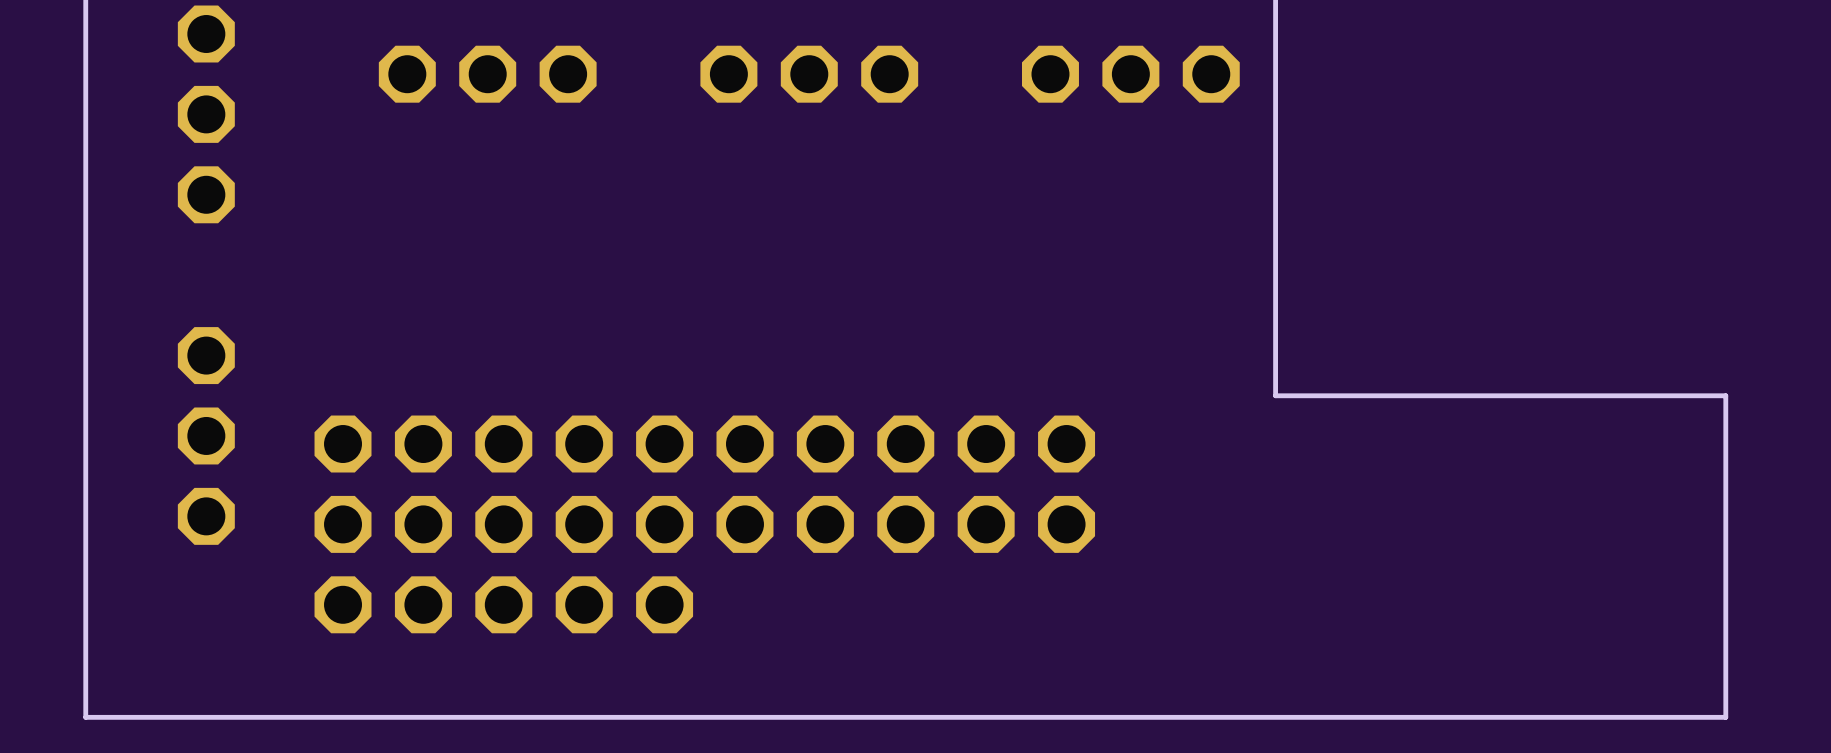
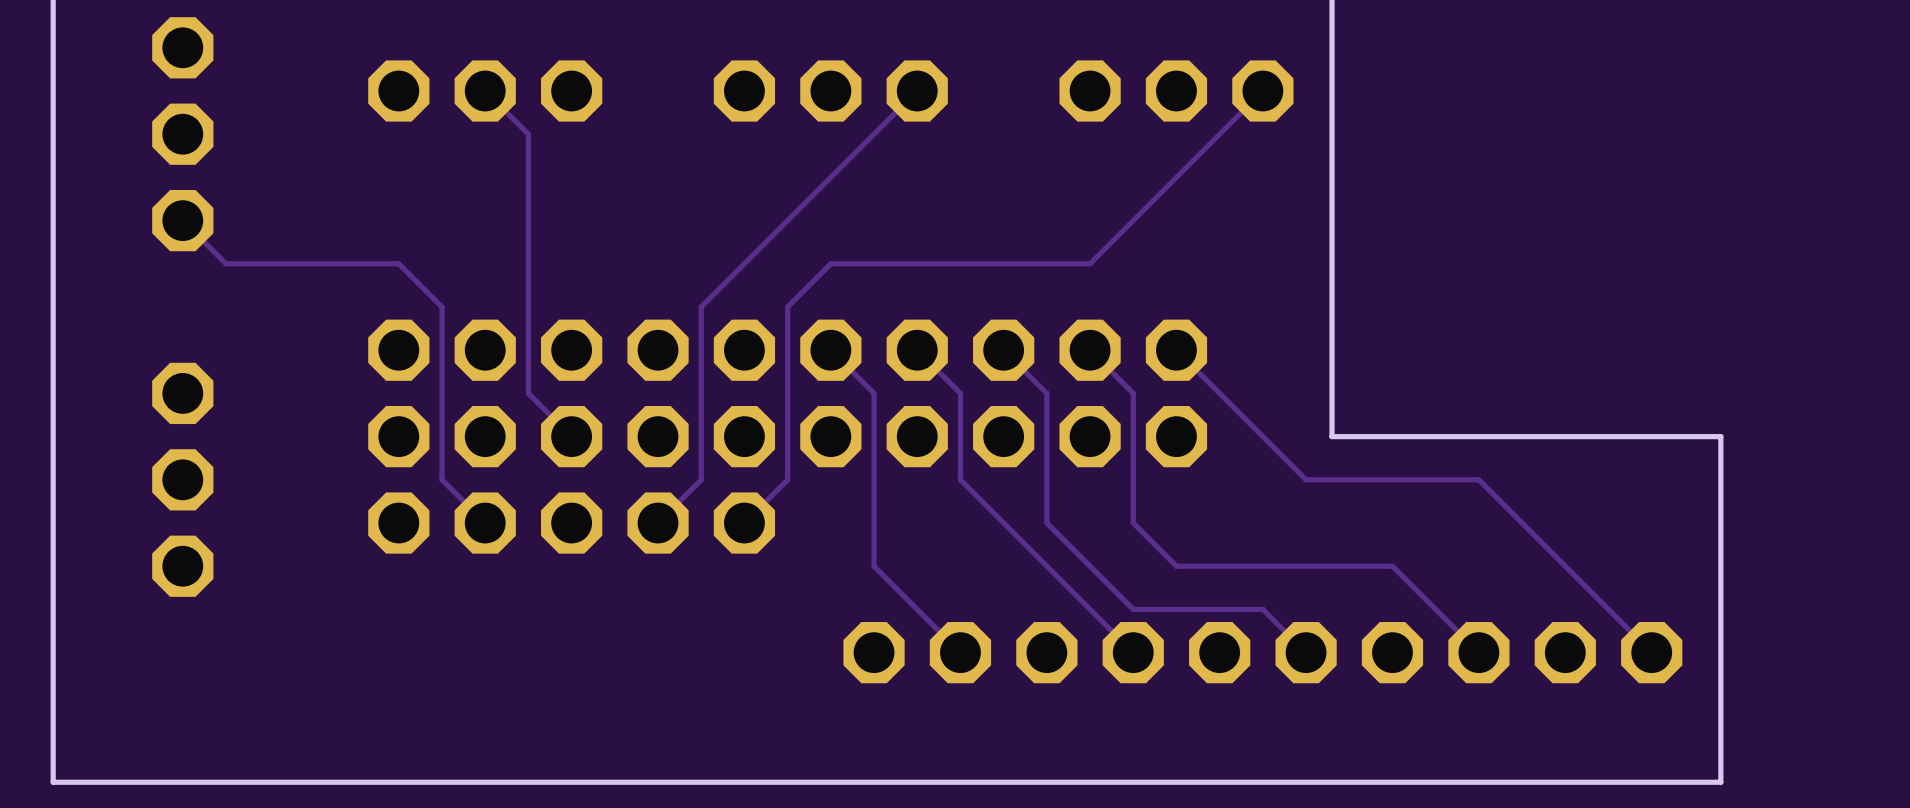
track: none -> (485, 91) (528, 134) (528, 393) (571, 436)
track: none -> (917, 91) (701, 307) (701, 479) (658, 523)
track: none -> (1262, 91) (1090, 263) (830, 263) (787, 307) (787, 479) (744, 523)
track: none -> (182, 220) (226, 263) (398, 263) (442, 307) (442, 479) (485, 523)
track: none -> (830, 350) (874, 393) (874, 566) (960, 652)
track: none -> (917, 350) (960, 393) (960, 479) (1133, 652)
track: none -> (1003, 350) (1046, 393) (1046, 523) (1133, 609) (1262, 609) (1306, 652)
track: none -> (1090, 350) (1133, 393) (1133, 523) (1176, 566) (1392, 566) (1478, 652)
track: none -> (1176, 350) (1306, 479) (1478, 479) (1651, 652)
board edge: (1637, 395) (1725, 395) (1725, 717) (1637, 717) -> (1720, 436) (1720, 782)
part position: (704, 524) -> (787, 436)
part: none -> (1262, 652)

